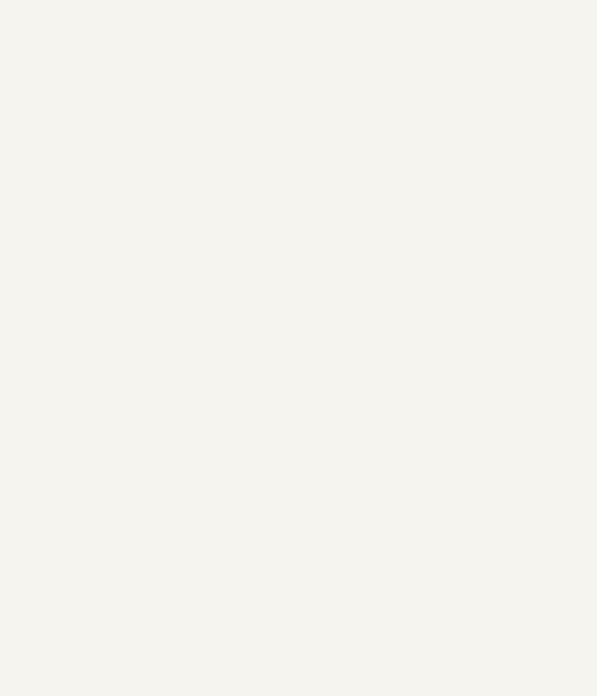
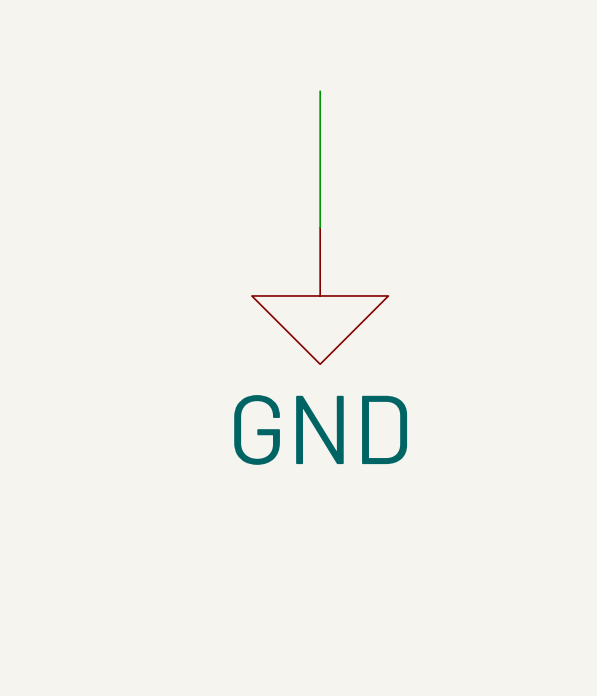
wire: none -> (320, 91) (320, 227)
power symbol: none -> GND (320, 295)

